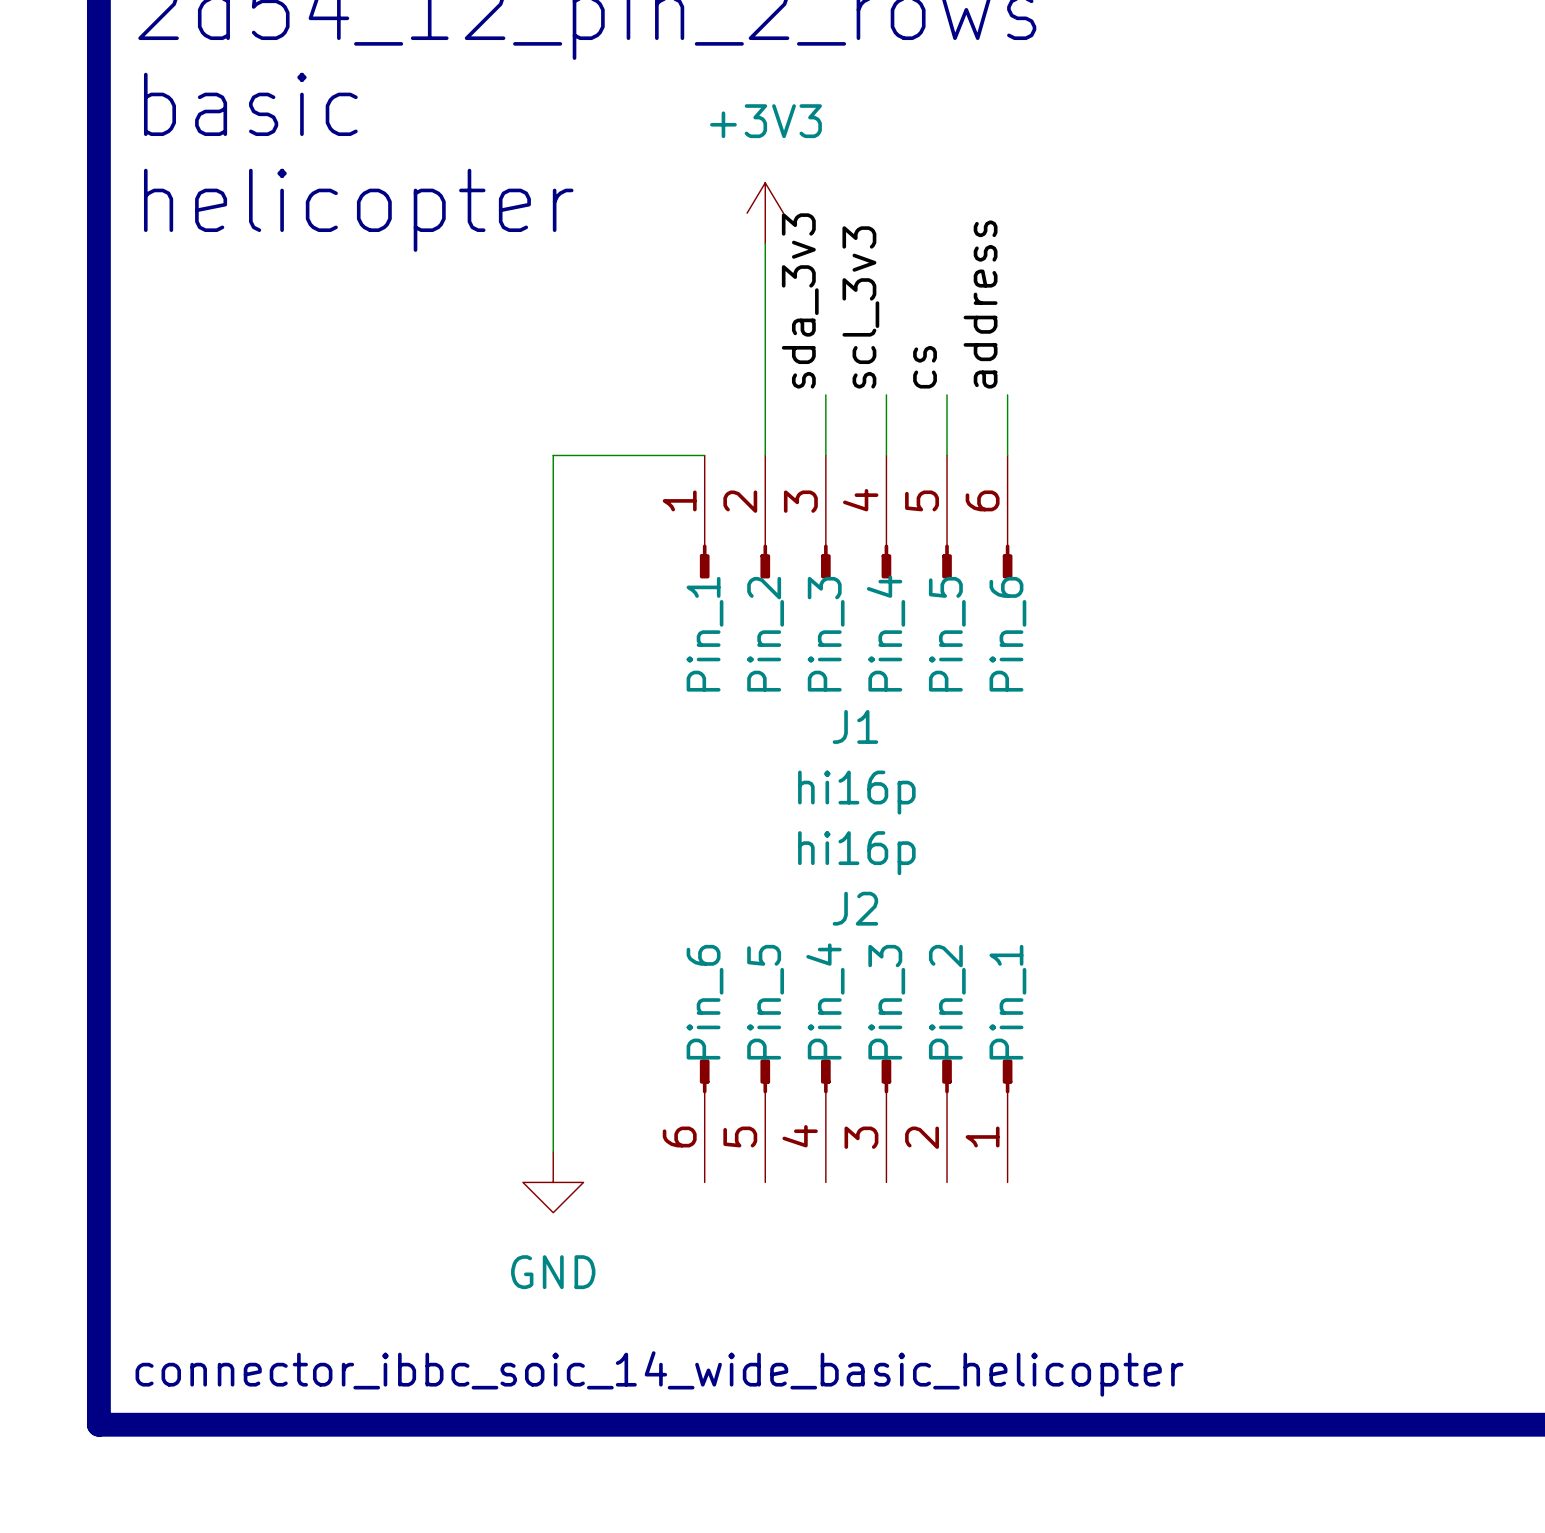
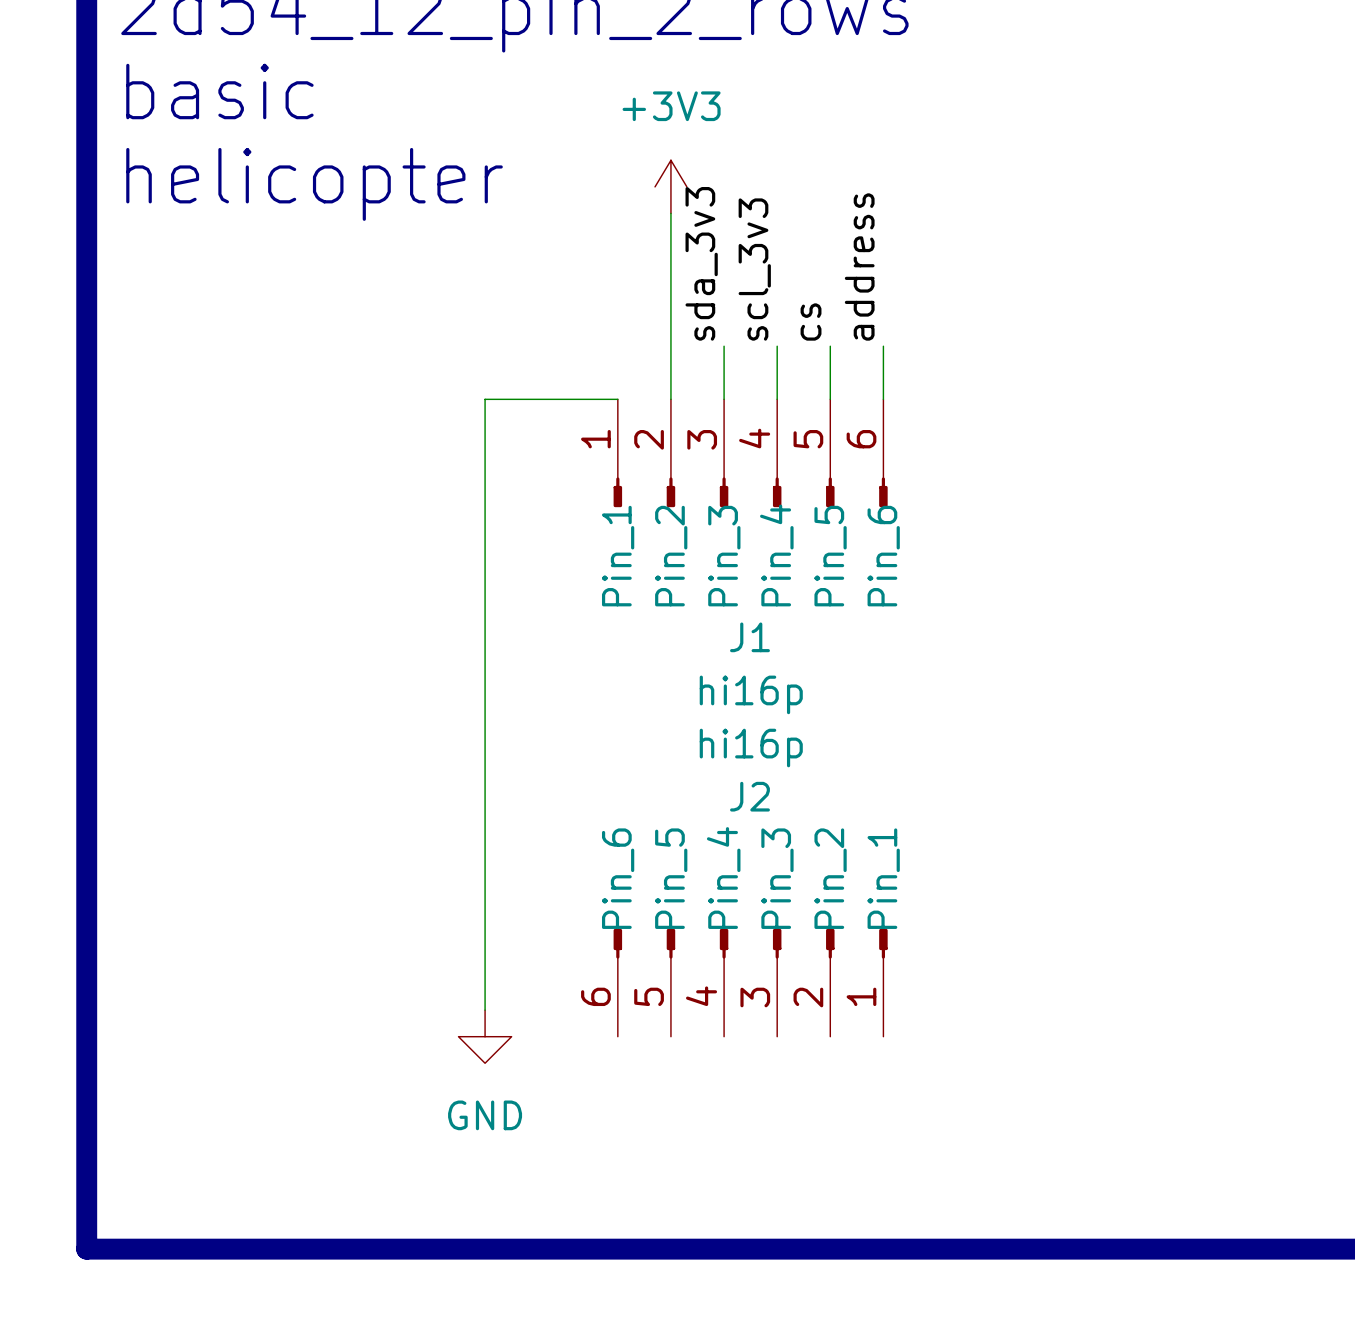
text: connector_ibbc_soic_14_wide_basic_helicopter (659, 1373) -> none

